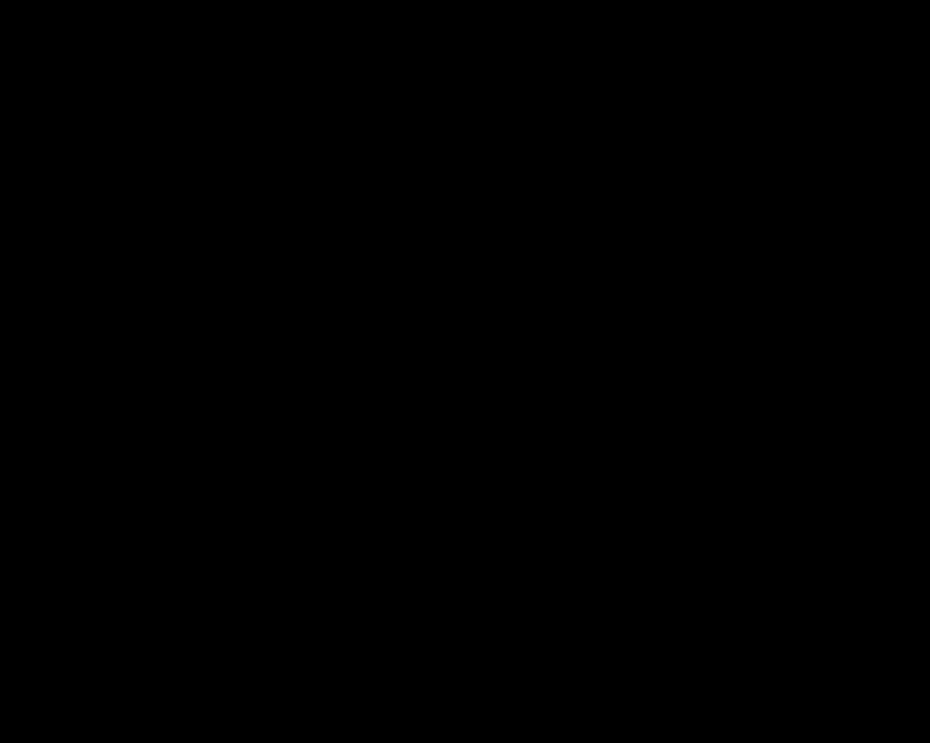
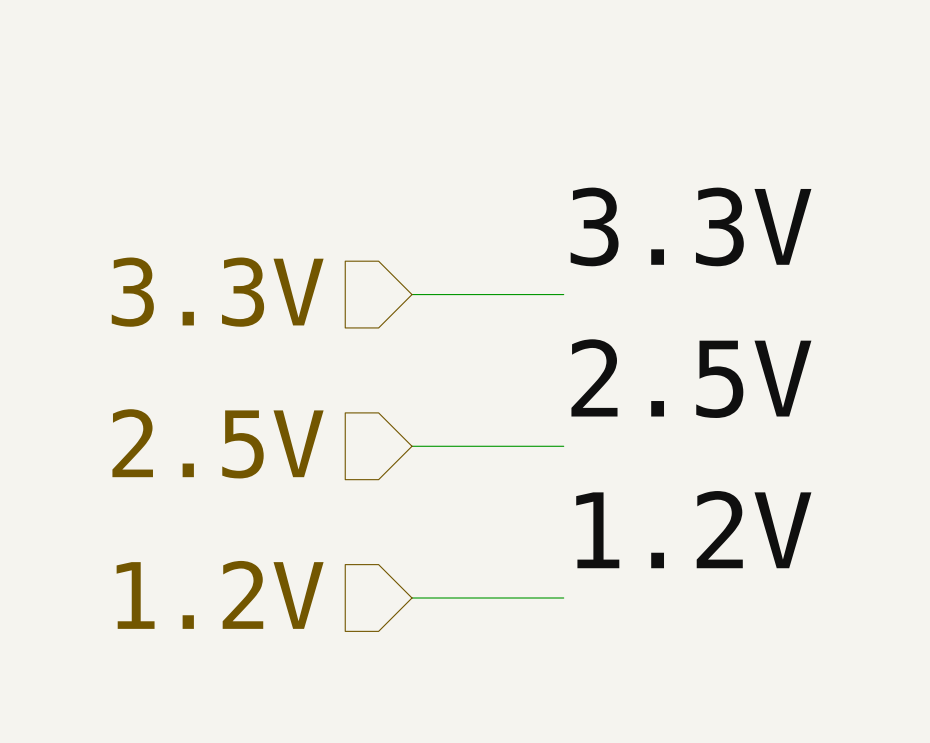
label: none -> 3.3V (691, 226)
hierarchical label: none -> 3.3V (217, 292)
wire: none -> (412, 294) (563, 294)
label: none -> 2.5V (691, 378)
hierarchical label: none -> 2.5V (218, 443)
wire: none -> (412, 446) (563, 446)
label: none -> 1.2V (693, 529)
hierarchical label: none -> 1.2V (220, 594)
wire: none -> (412, 598) (563, 598)

